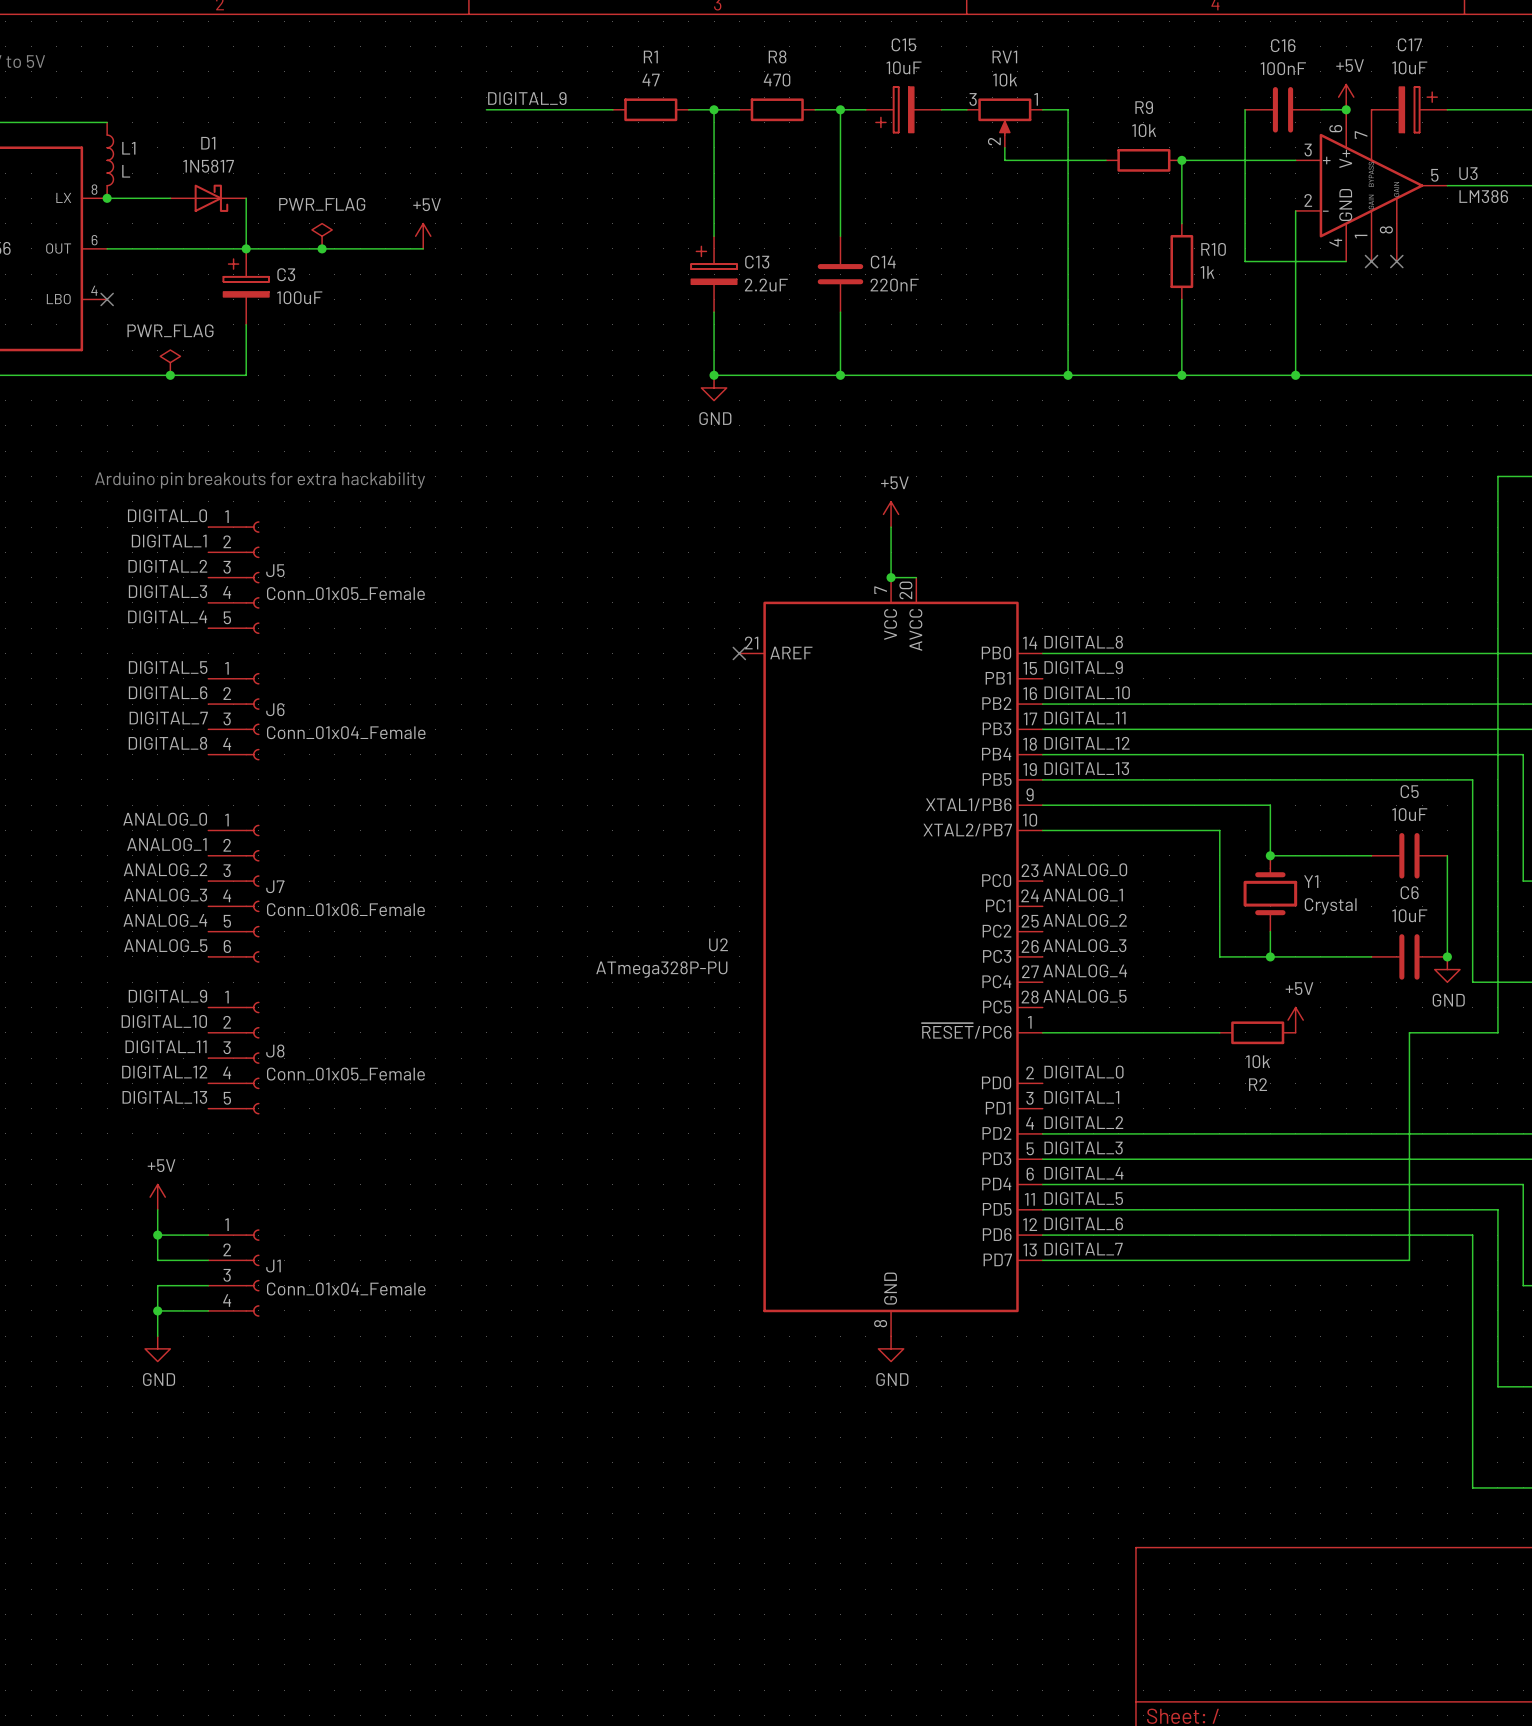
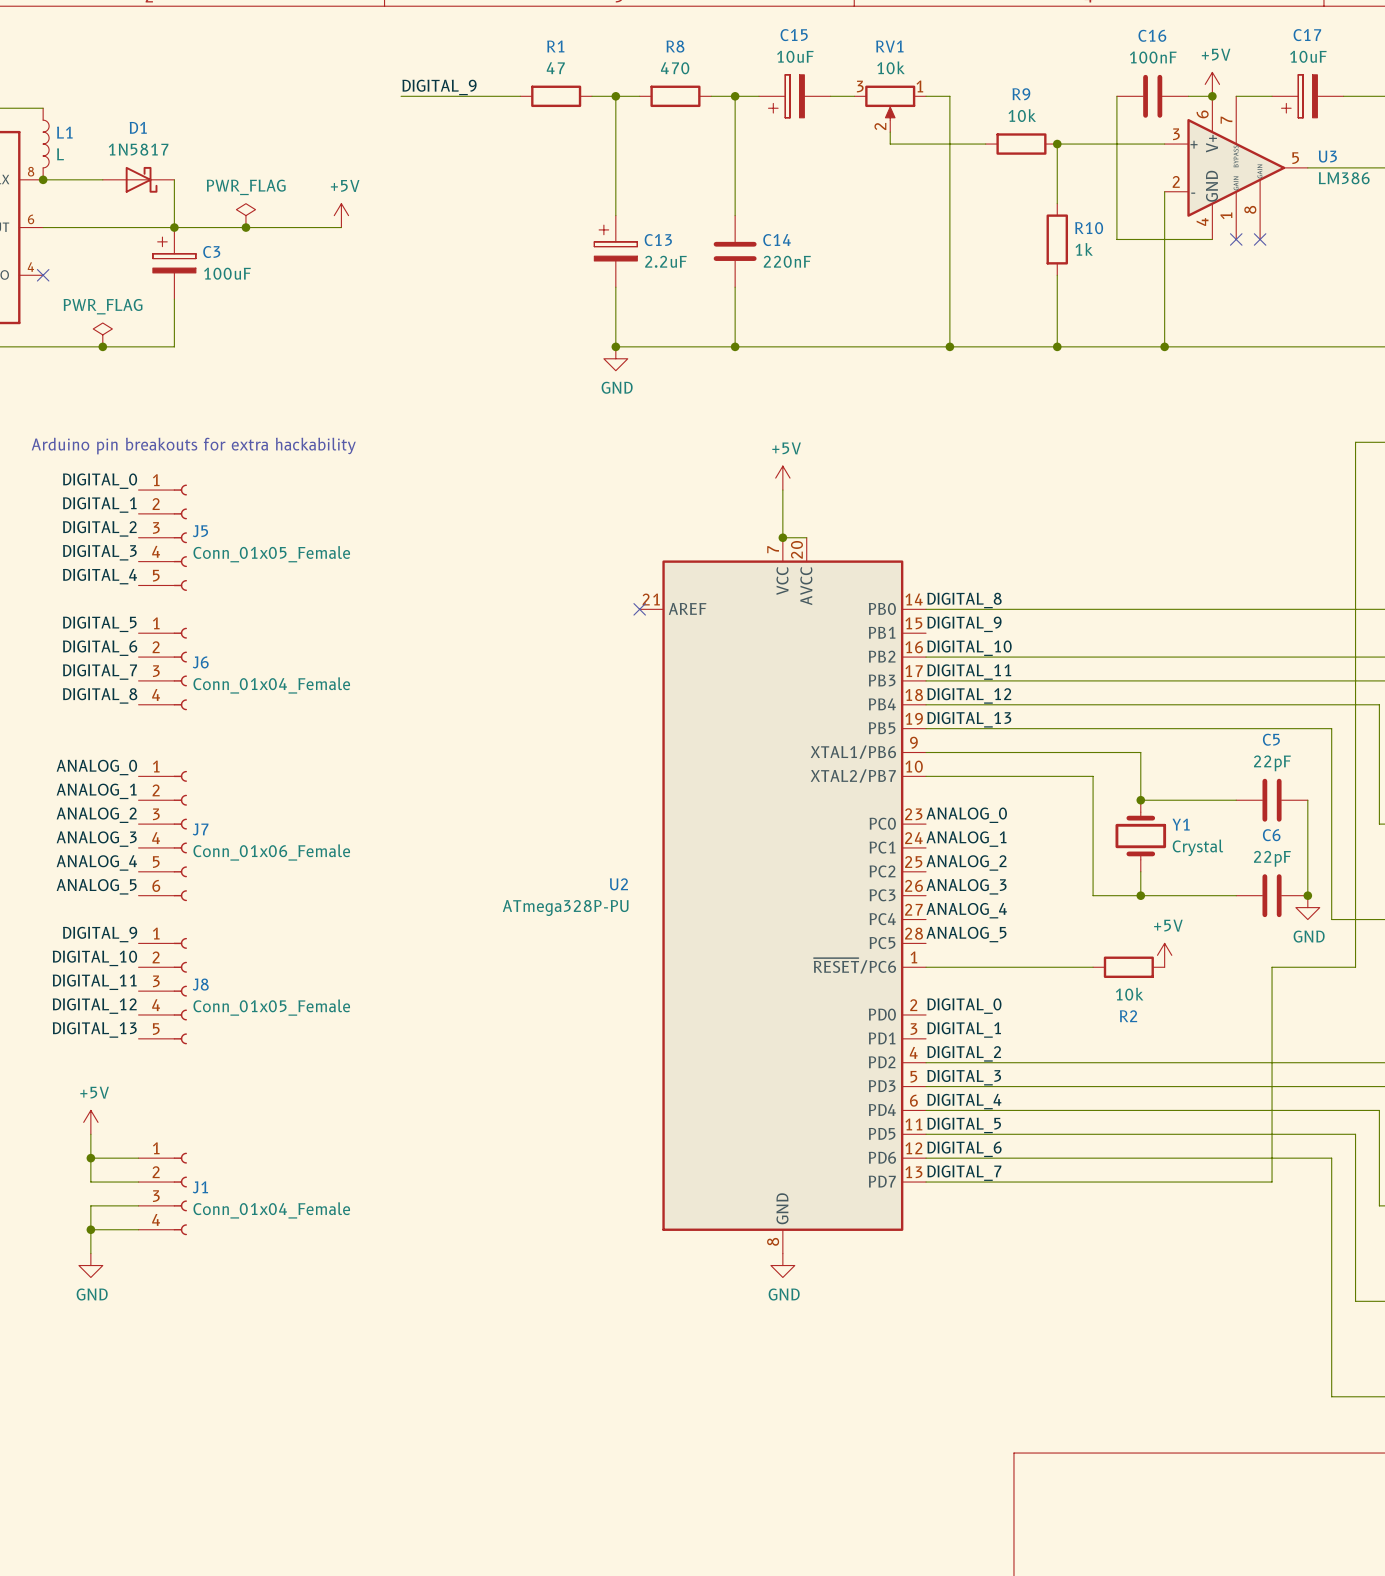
C17 rotation: 0° (1418, 109) -> 180° (1299, 96)
C5 value: 10uF (1409, 814) -> 22pF (1272, 763)
C6 value: 10uF (1409, 915) -> 22pF (1272, 858)

